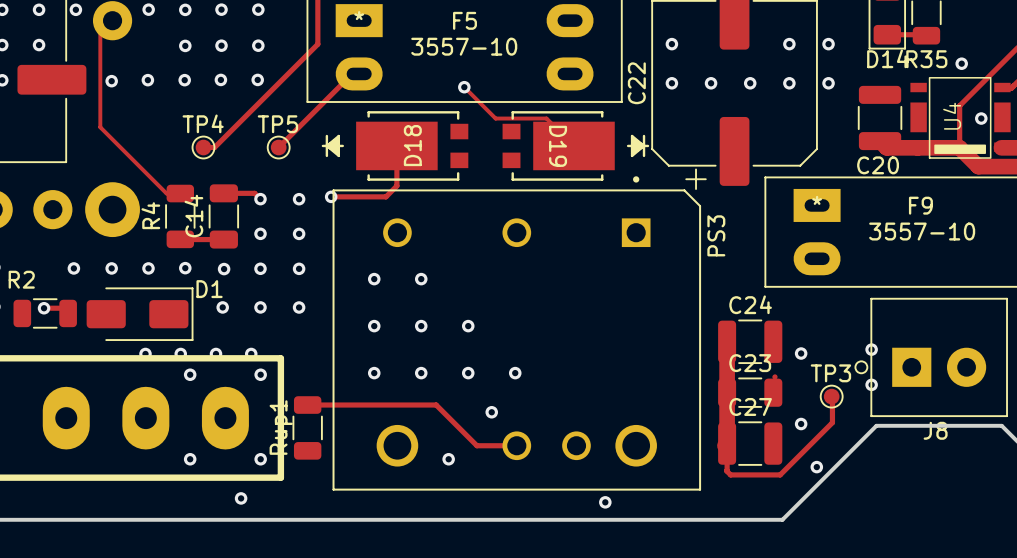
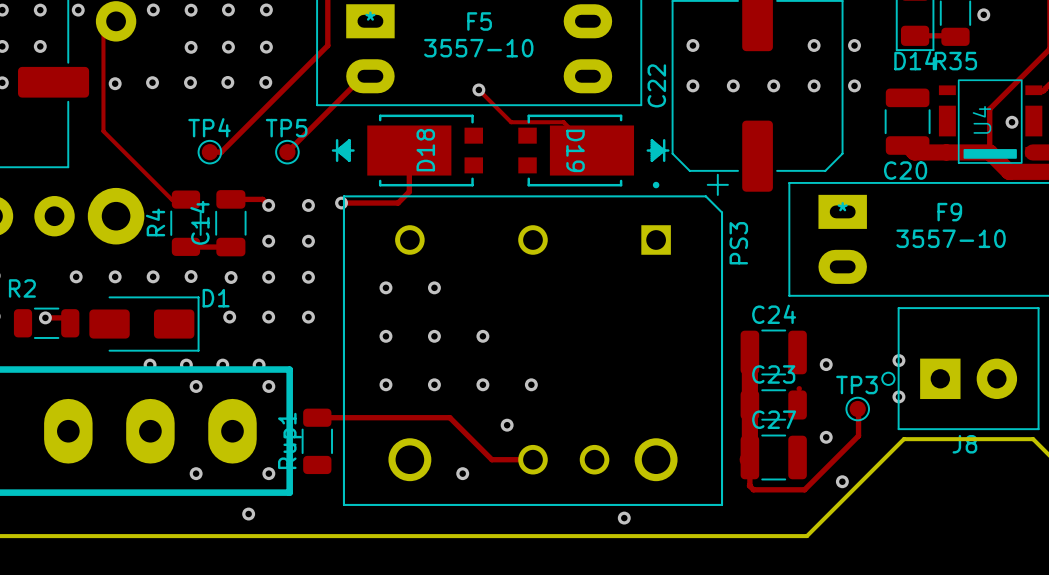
via position: (961, 63) -> (983, 14)

